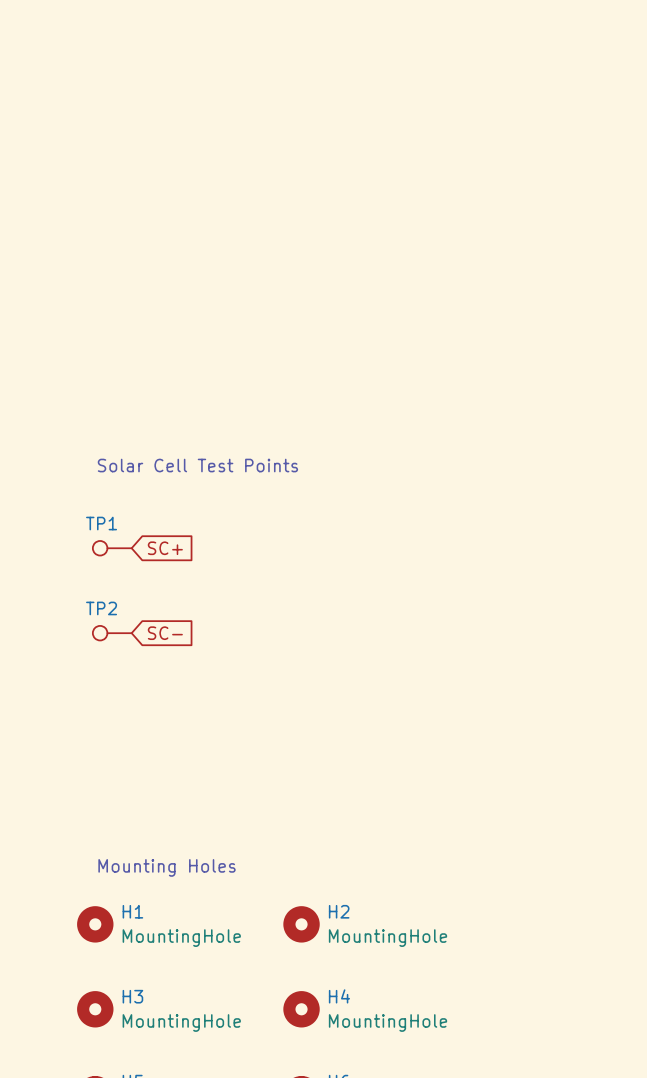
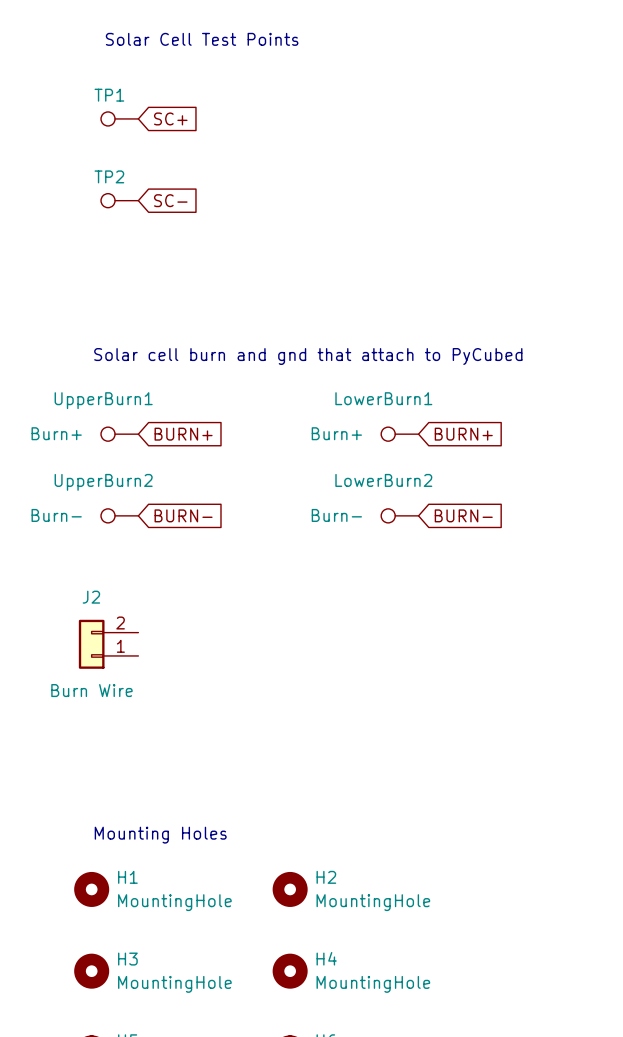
text: none -> Solar Cell Test Points (202, 39)
global label: none -> SC+ (170, 118)
global label: none -> SC- (170, 200)
text: none -> Solar cell burn and gnd that attach to PyCubed (308, 356)
UpperBurn1: none -> Burn+ (119, 434)
global label: none -> BURN+ (183, 434)
LowerBurn1: none -> Burn+ (399, 434)
global label: none -> BURN+ (463, 434)
text: Solar Cell Test Points (197, 465) -> none
UpperBurn2: none -> Burn- (119, 515)
global label: none -> BURN- (183, 515)
LowerBurn2: none -> Burn- (399, 515)
global label: none -> BURN- (463, 515)
TP1 position: (112, 548) -> (119, 118)
global label: SC+ (165, 548) -> none
TP2 position: (112, 633) -> (119, 200)
global label: SC- (165, 633) -> none
J2: none -> Burn Wire (108, 644)

